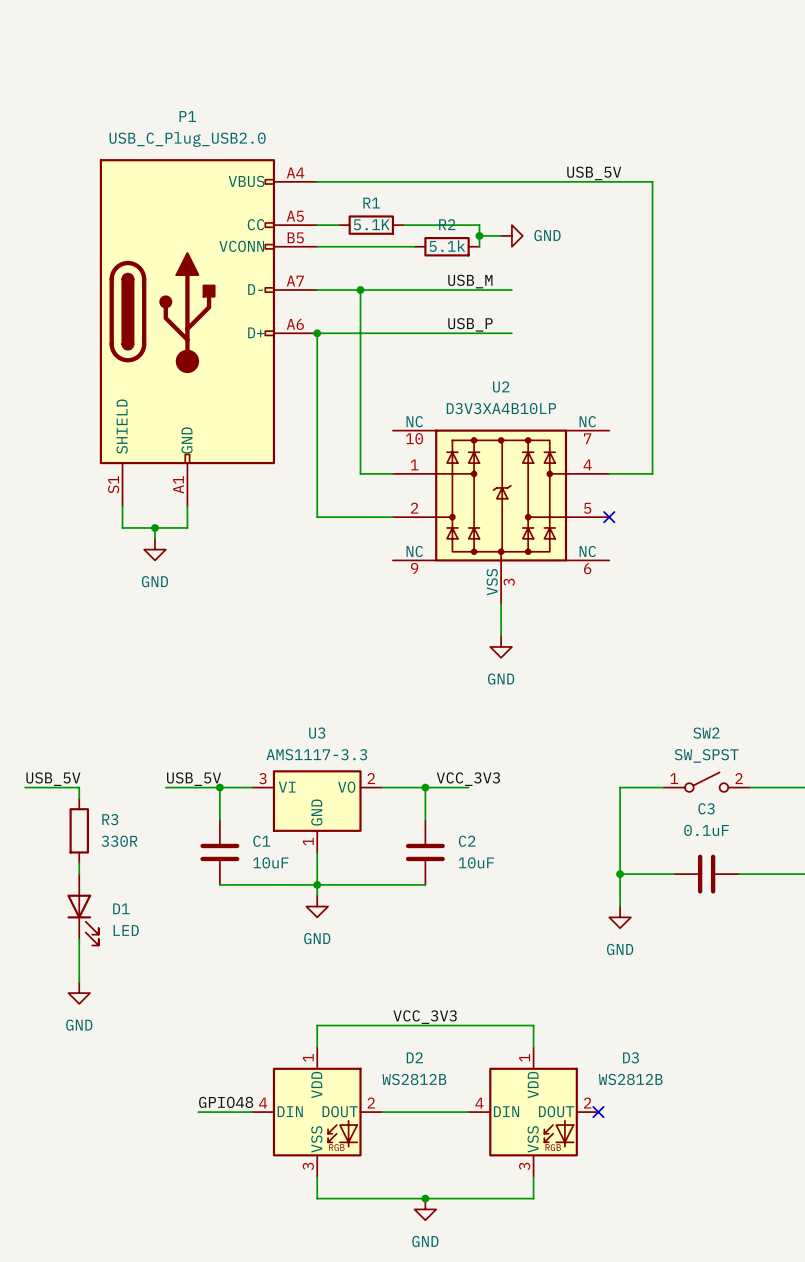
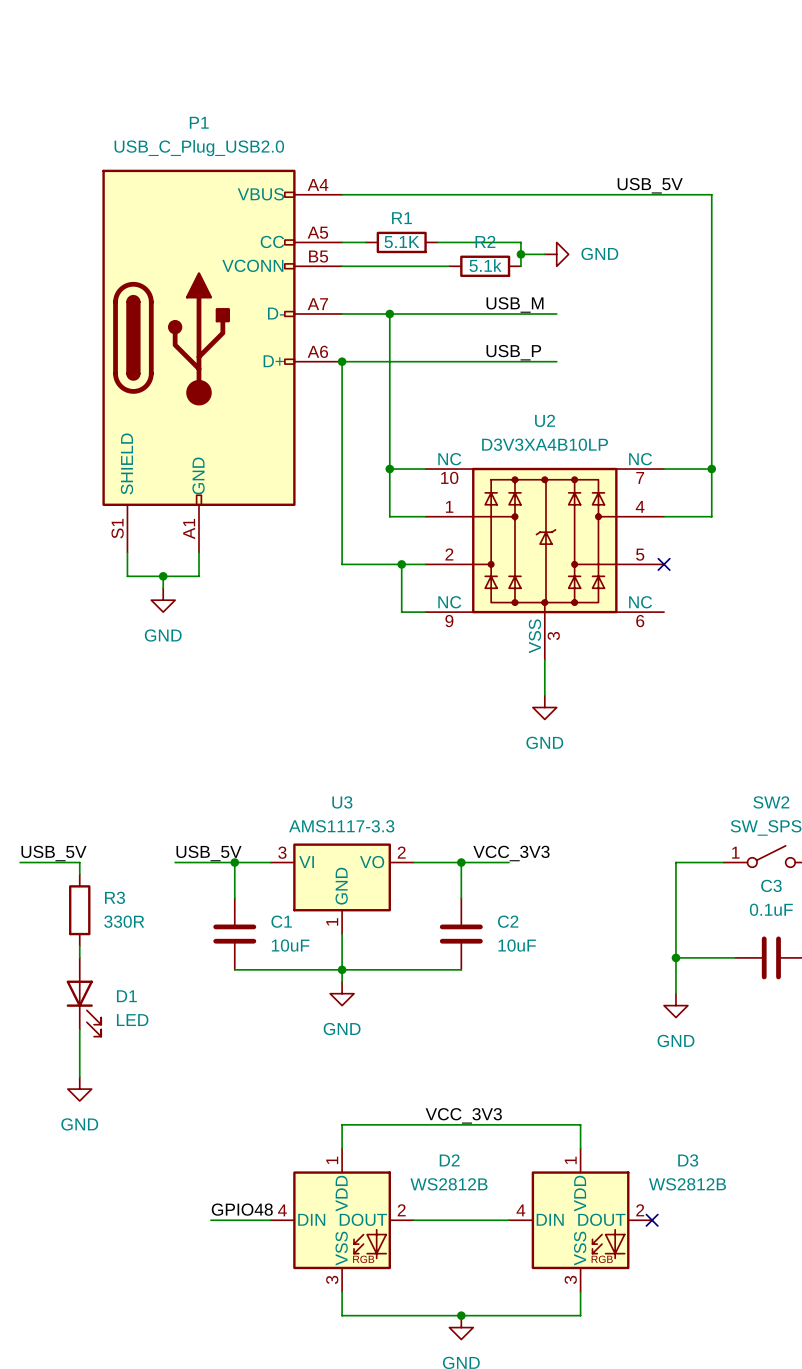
wire: none -> (389, 469) (425, 469)
junction: none -> (389, 469)
wire: none -> (664, 469) (711, 469)
junction: none -> (711, 469)
wire: none -> (401, 564) (401, 612) (425, 612)
junction: none -> (401, 564)

